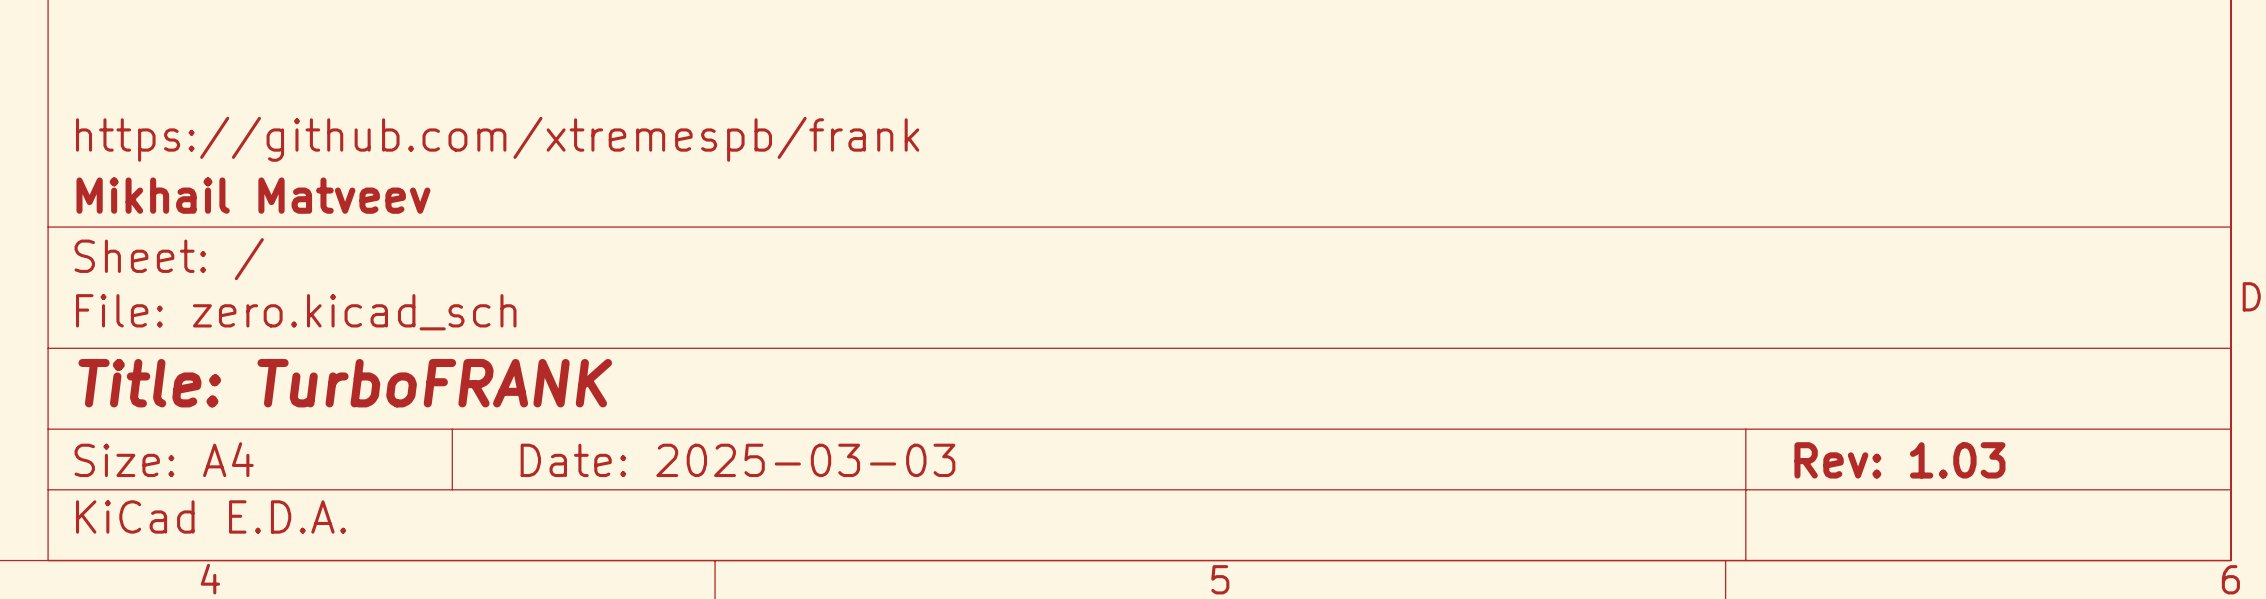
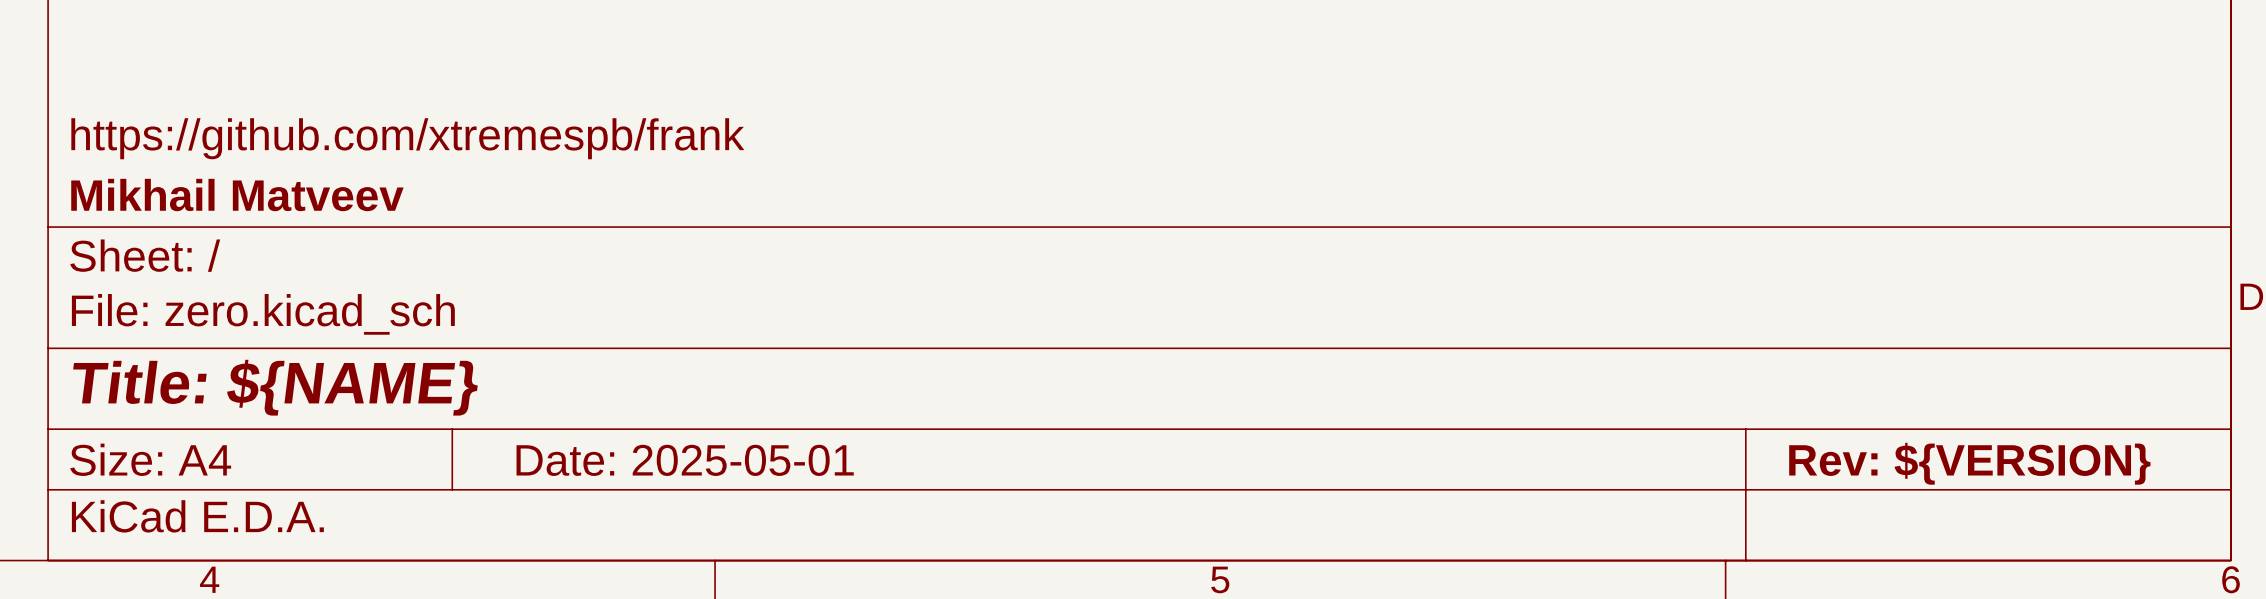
title block: Title: TurboFRANK (345, 383) -> Title: ${NAME} (275, 387)
title block: Date: 2025-03-03 (738, 460) -> Date: 2025-05-01 (685, 460)
title block: Rev: 1.03 (1899, 460) -> Rev: ${VERSION} (1969, 463)

